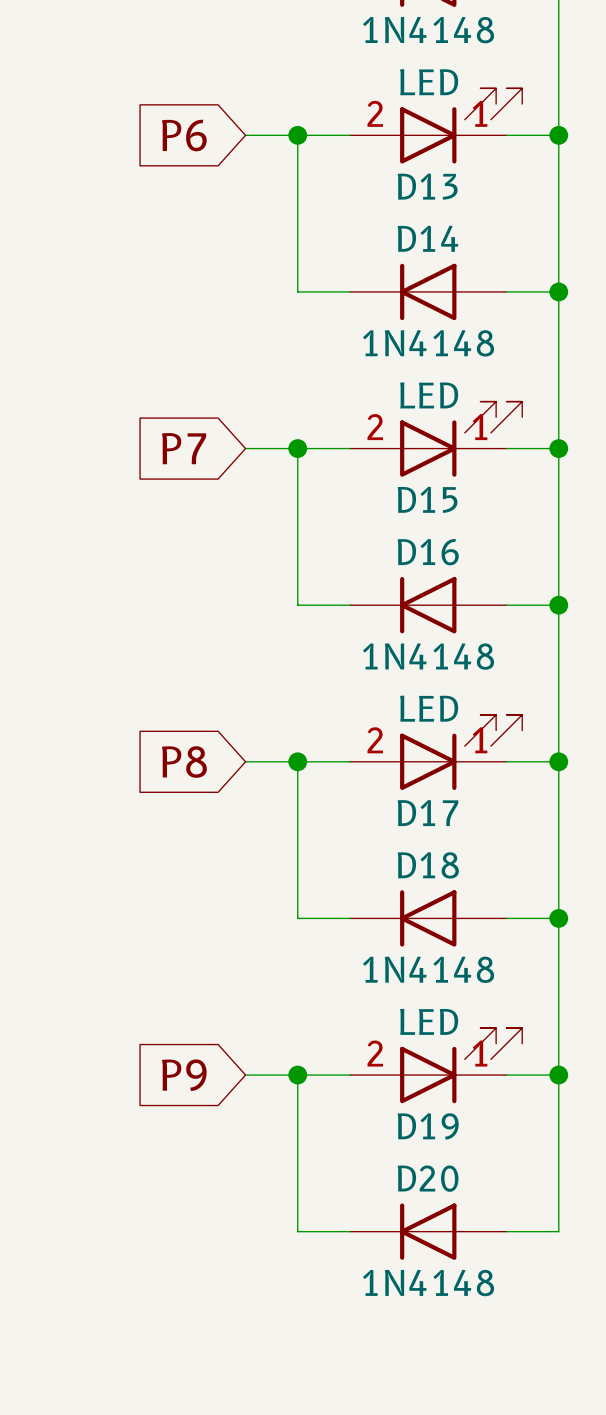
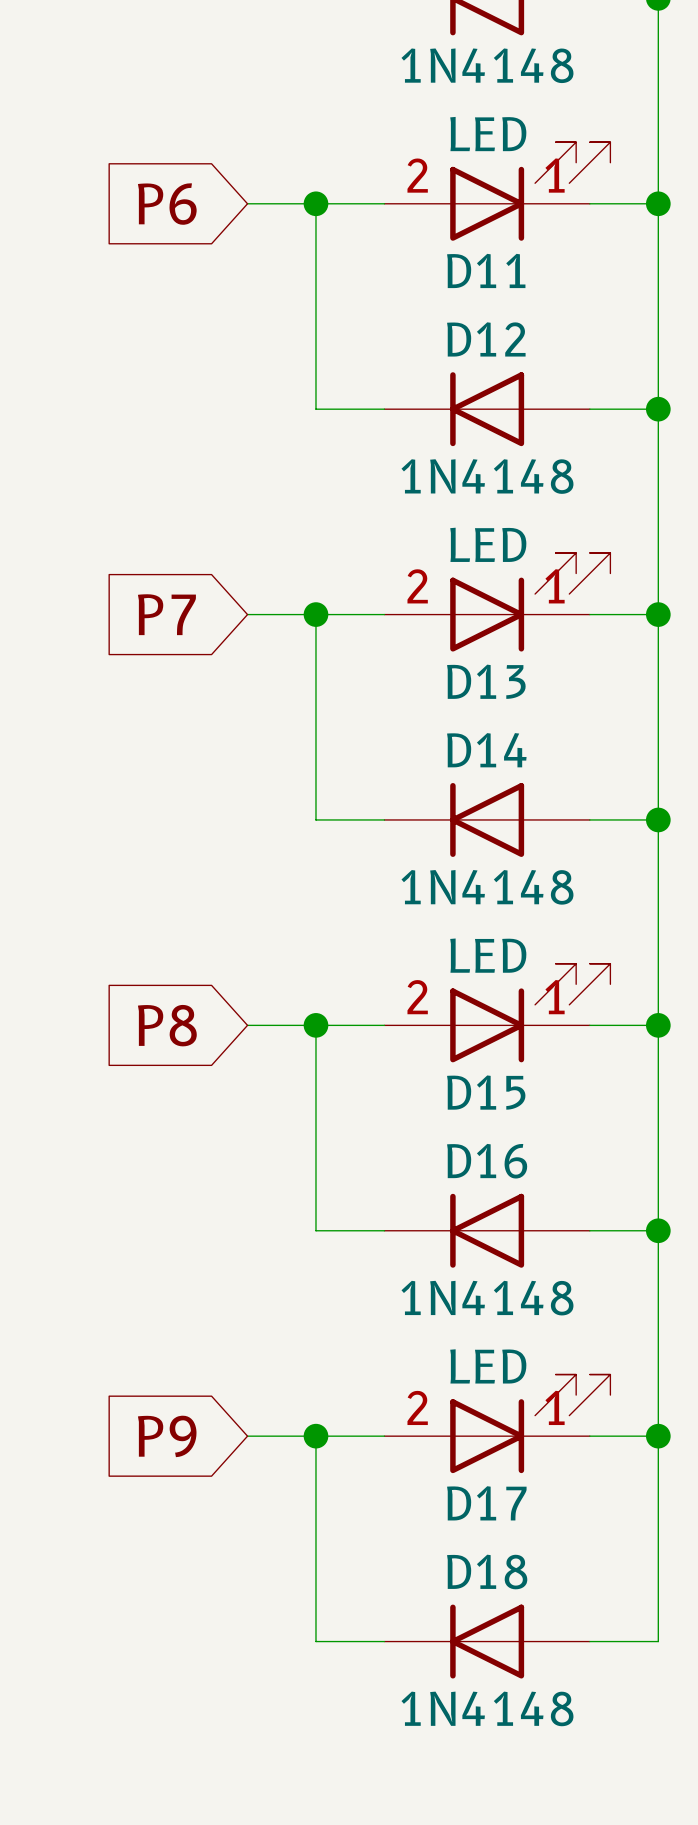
D13 name: D13 (427, 186) -> D11 (486, 270)
D14 name: D14 (428, 238) -> D12 (486, 339)
D15 name: D15 (427, 499) -> D13 (486, 681)
D16 name: D16 (428, 552) -> D14 (486, 750)
D17 name: D17 (428, 813) -> D15 (486, 1092)
D18 name: D18 (428, 865) -> D16 (487, 1161)
D19 name: D19 (428, 1126) -> D17 (486, 1503)
D20 name: D20 (428, 1178) -> D18 (487, 1572)

